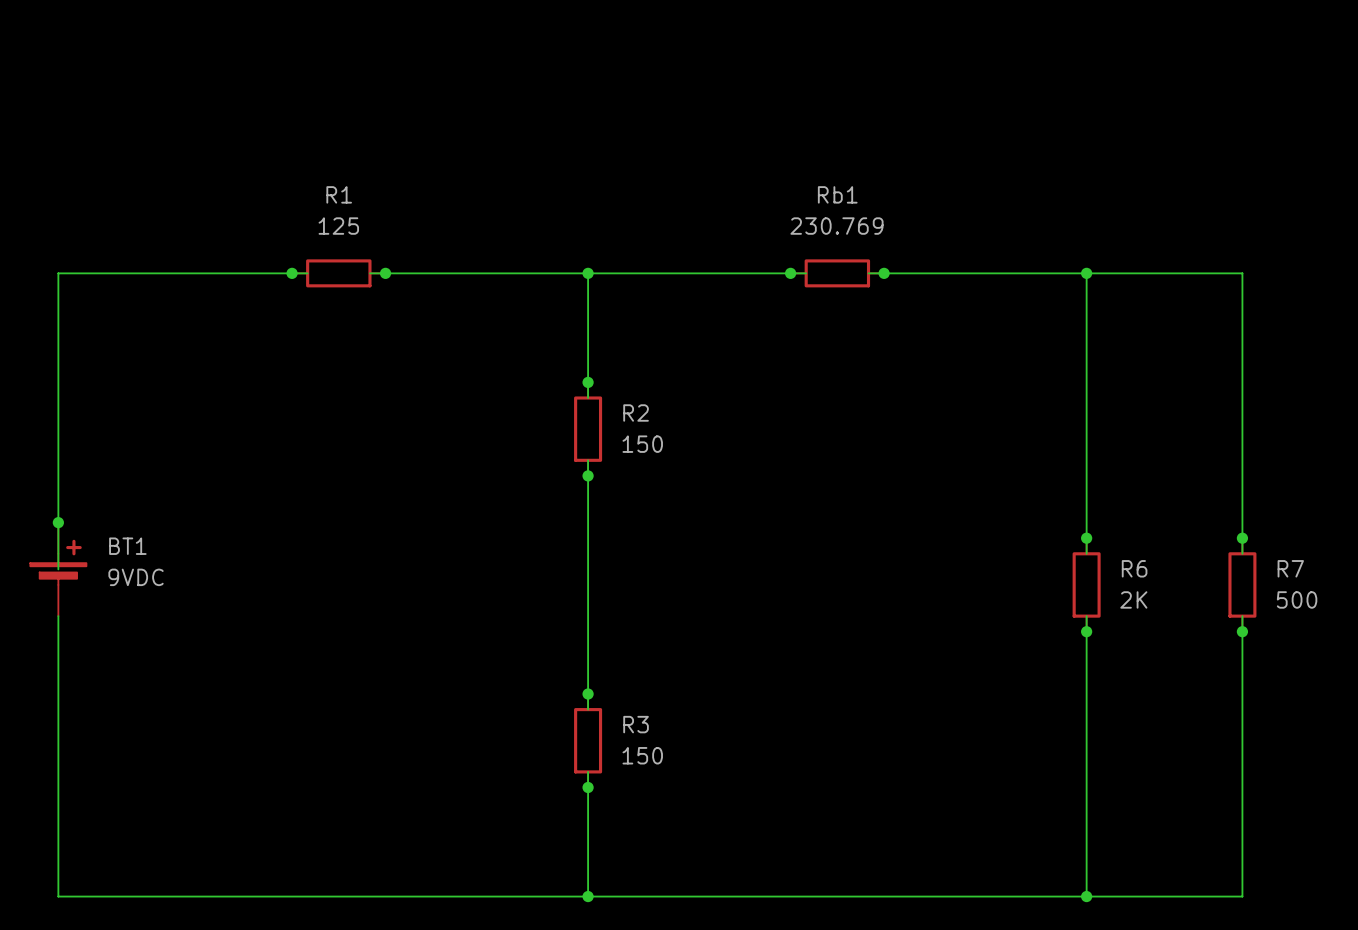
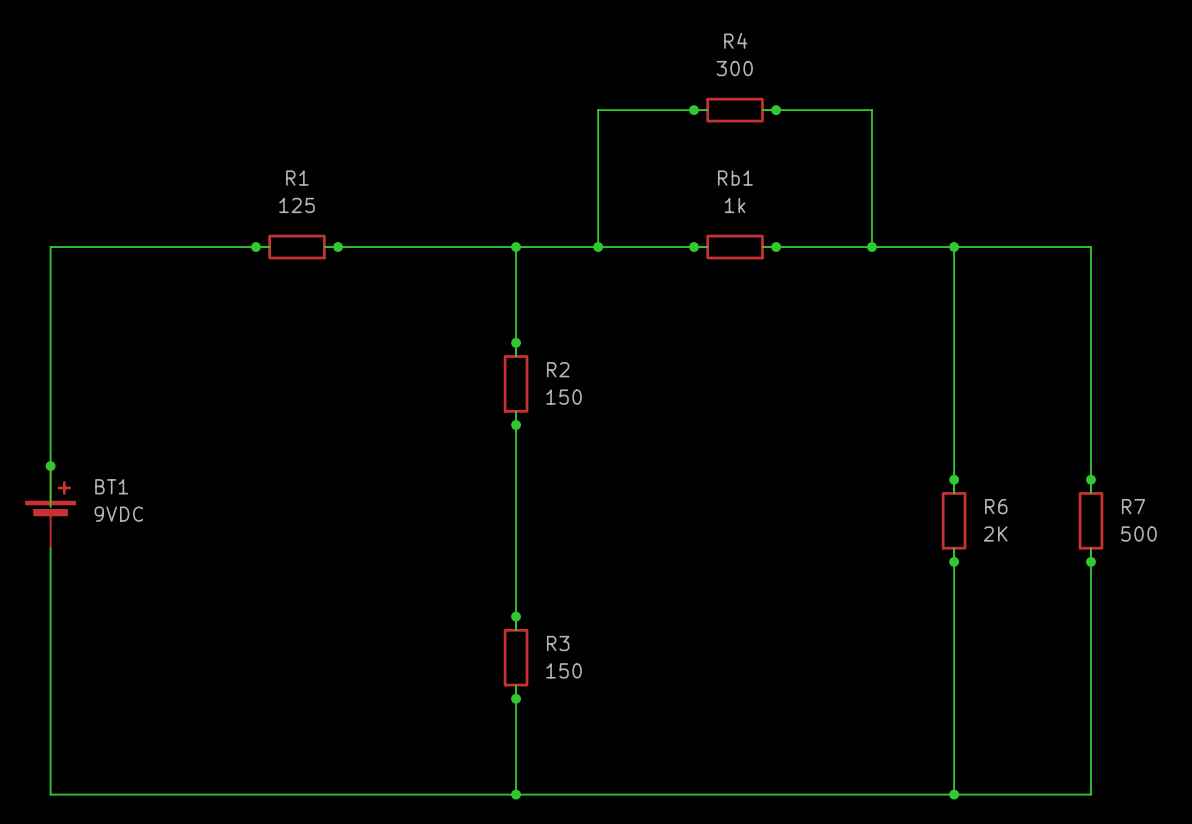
junction: none -> (694, 110)
wire: none -> (707, 110) (598, 110) (598, 247)
R4: none -> 300 (735, 110)
wire: none -> (762, 110) (871, 110) (871, 247)
junction: none -> (776, 110)
Rb1 value: 230.769 (836, 226) -> 1k (735, 205)
junction: none -> (598, 247)
junction: none -> (871, 247)

